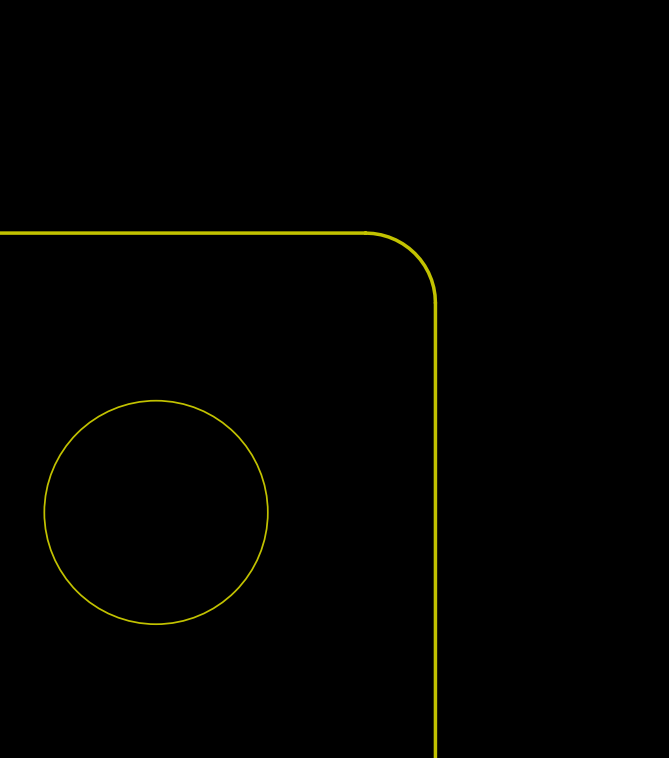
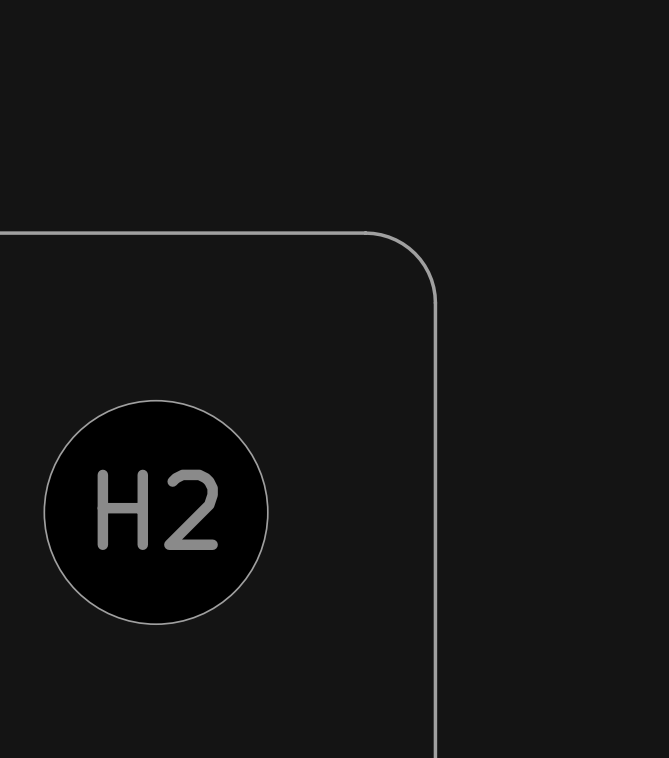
H2 name: none -> H2 (157, 509)

